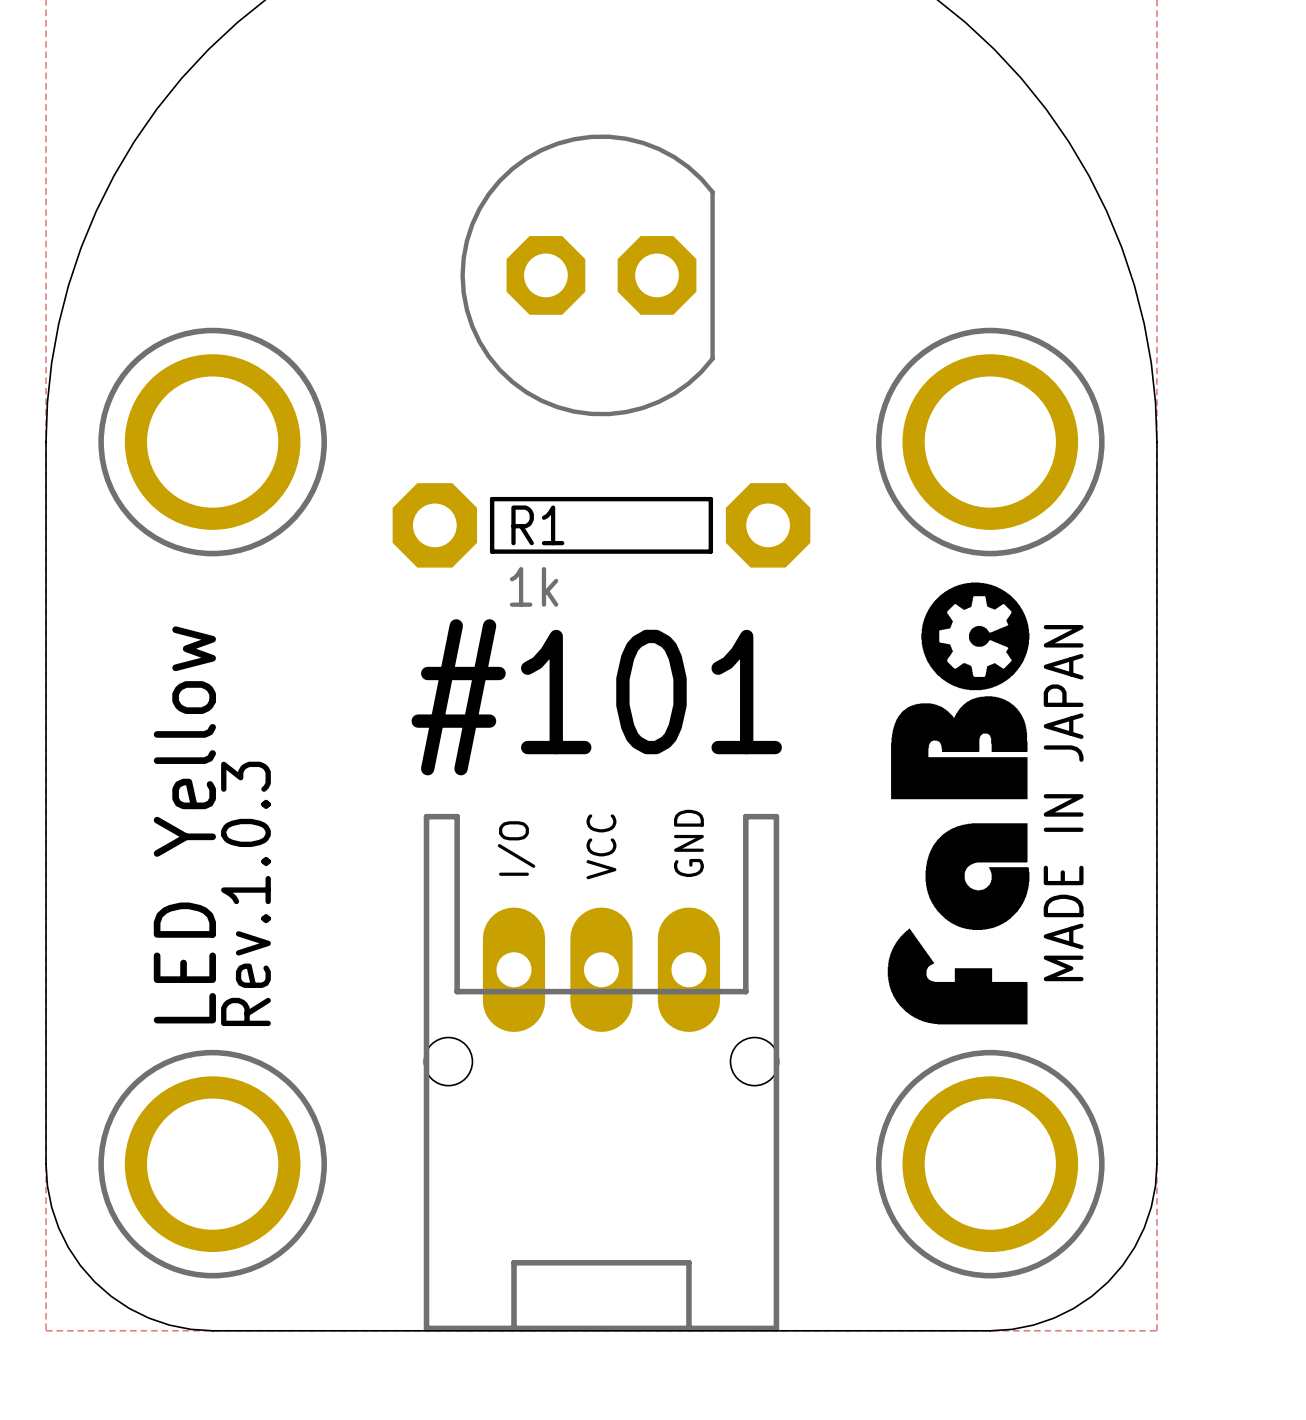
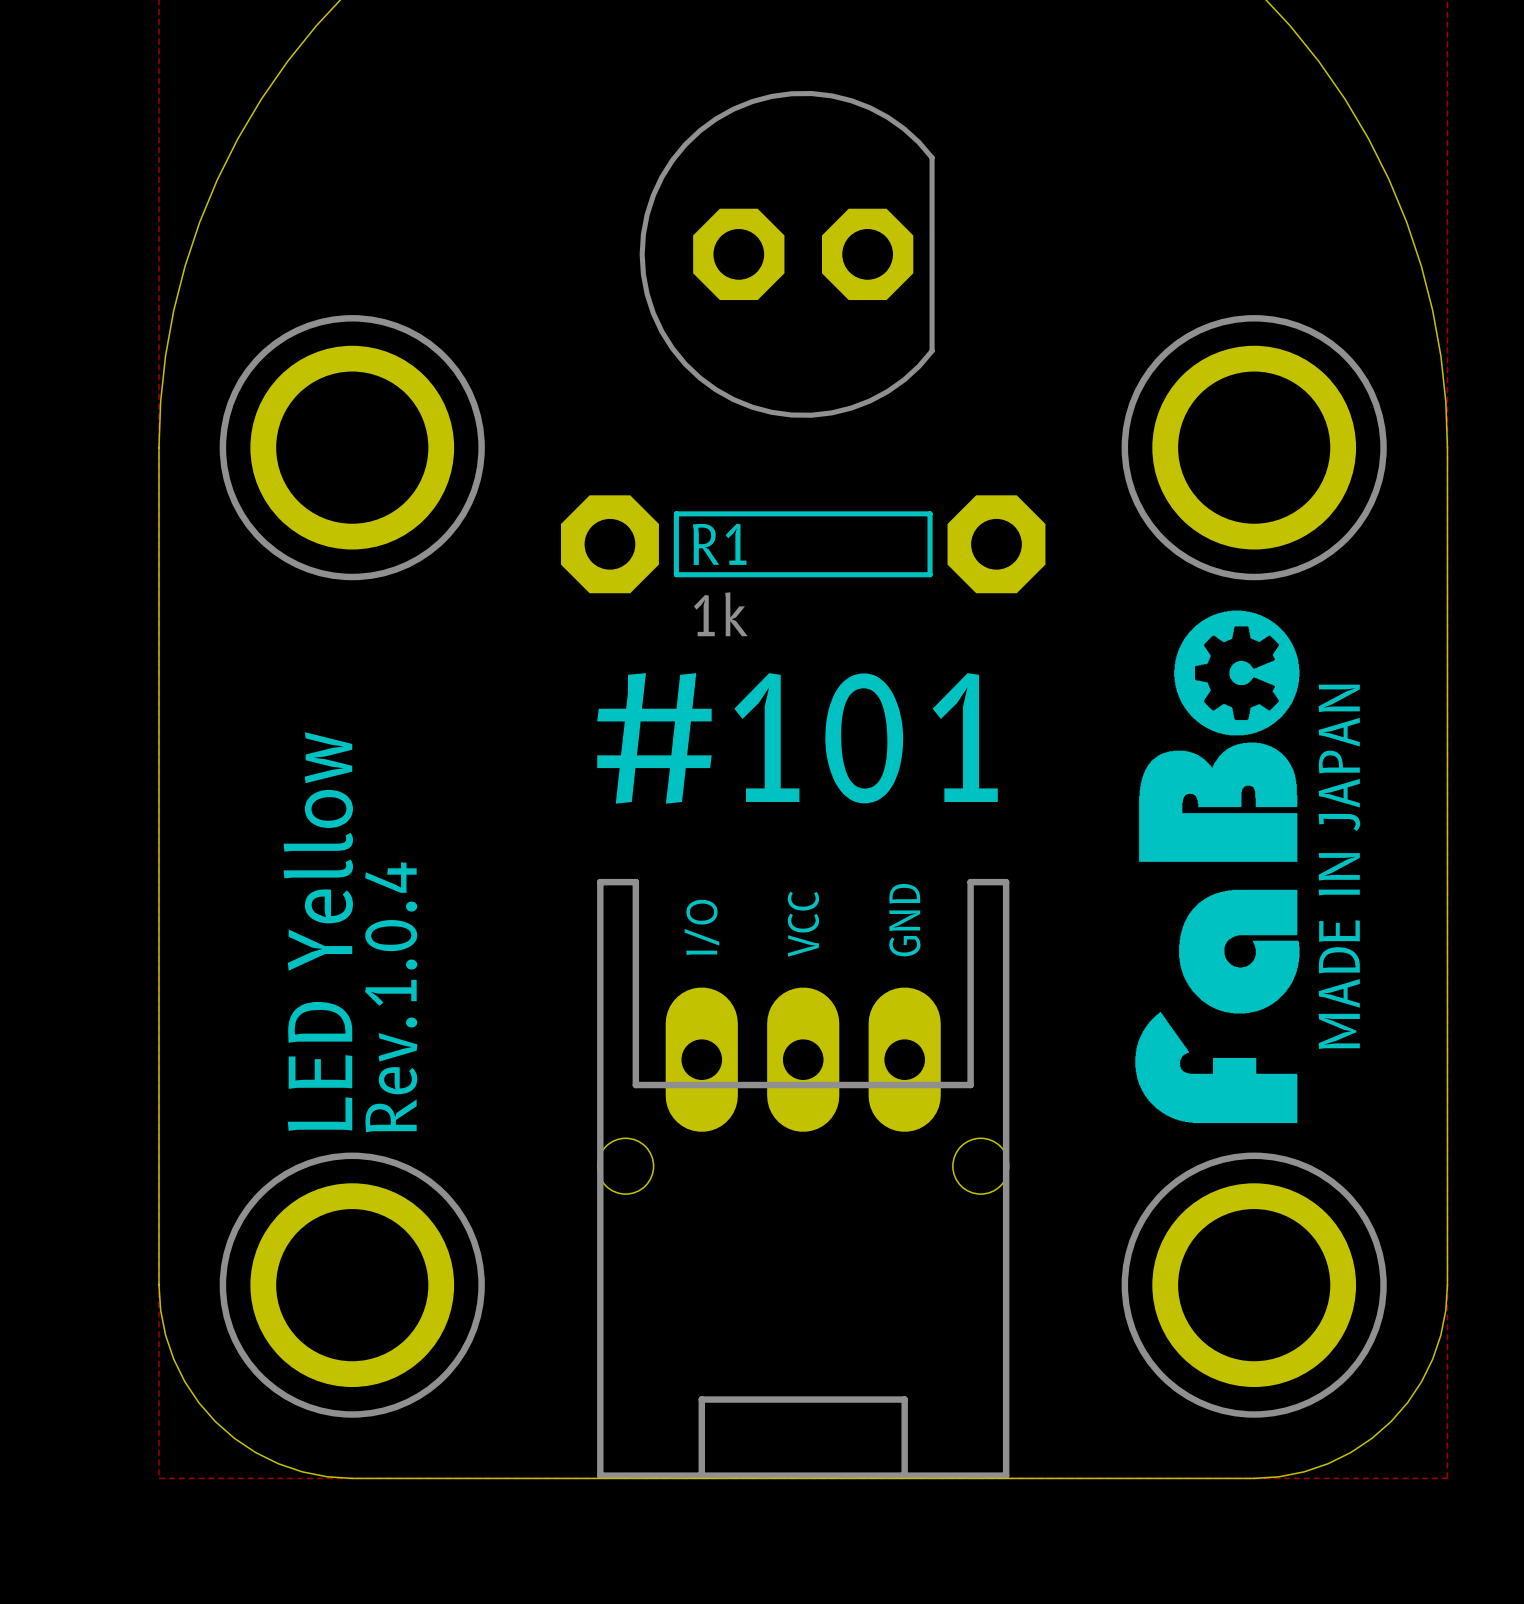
text: Rev.1.0.3 (245, 893) -> Rev.1.0.4 (391, 997)

